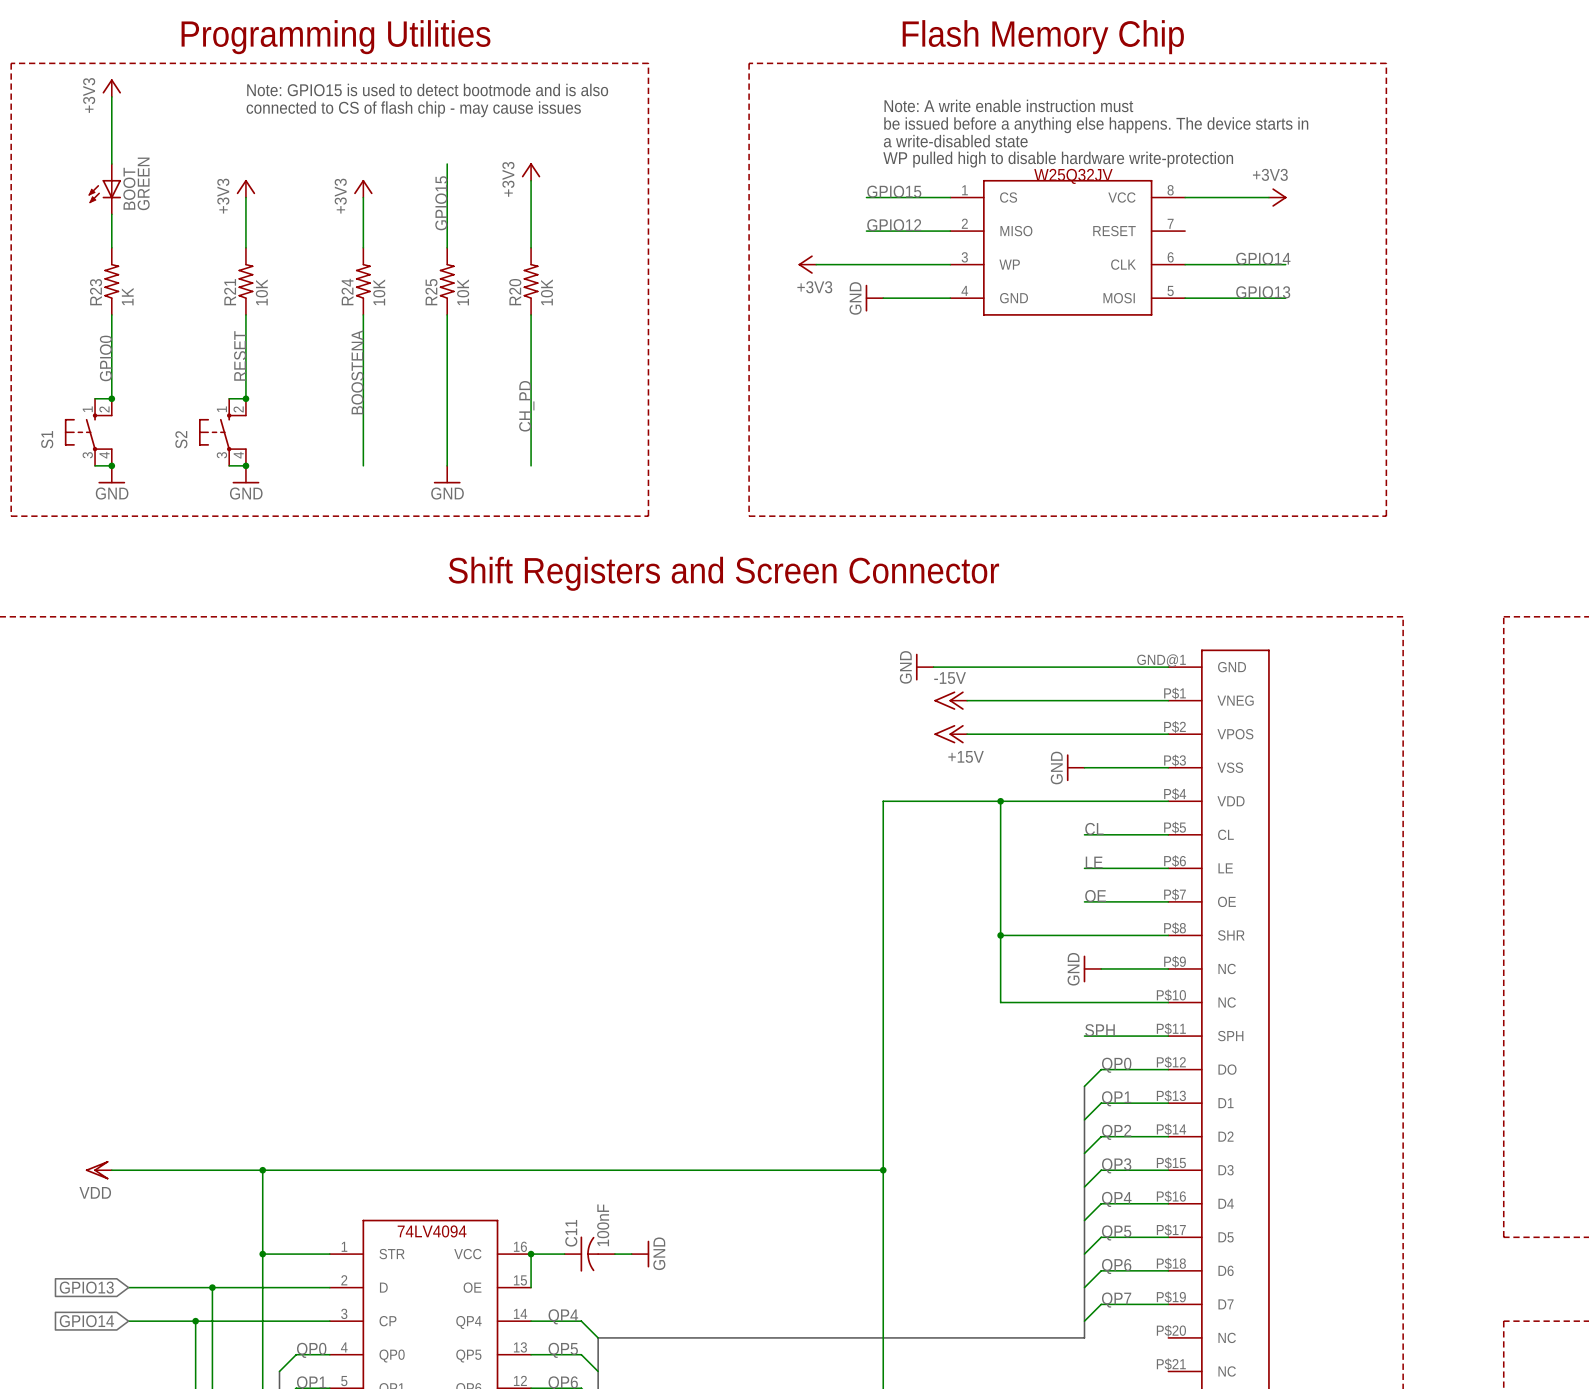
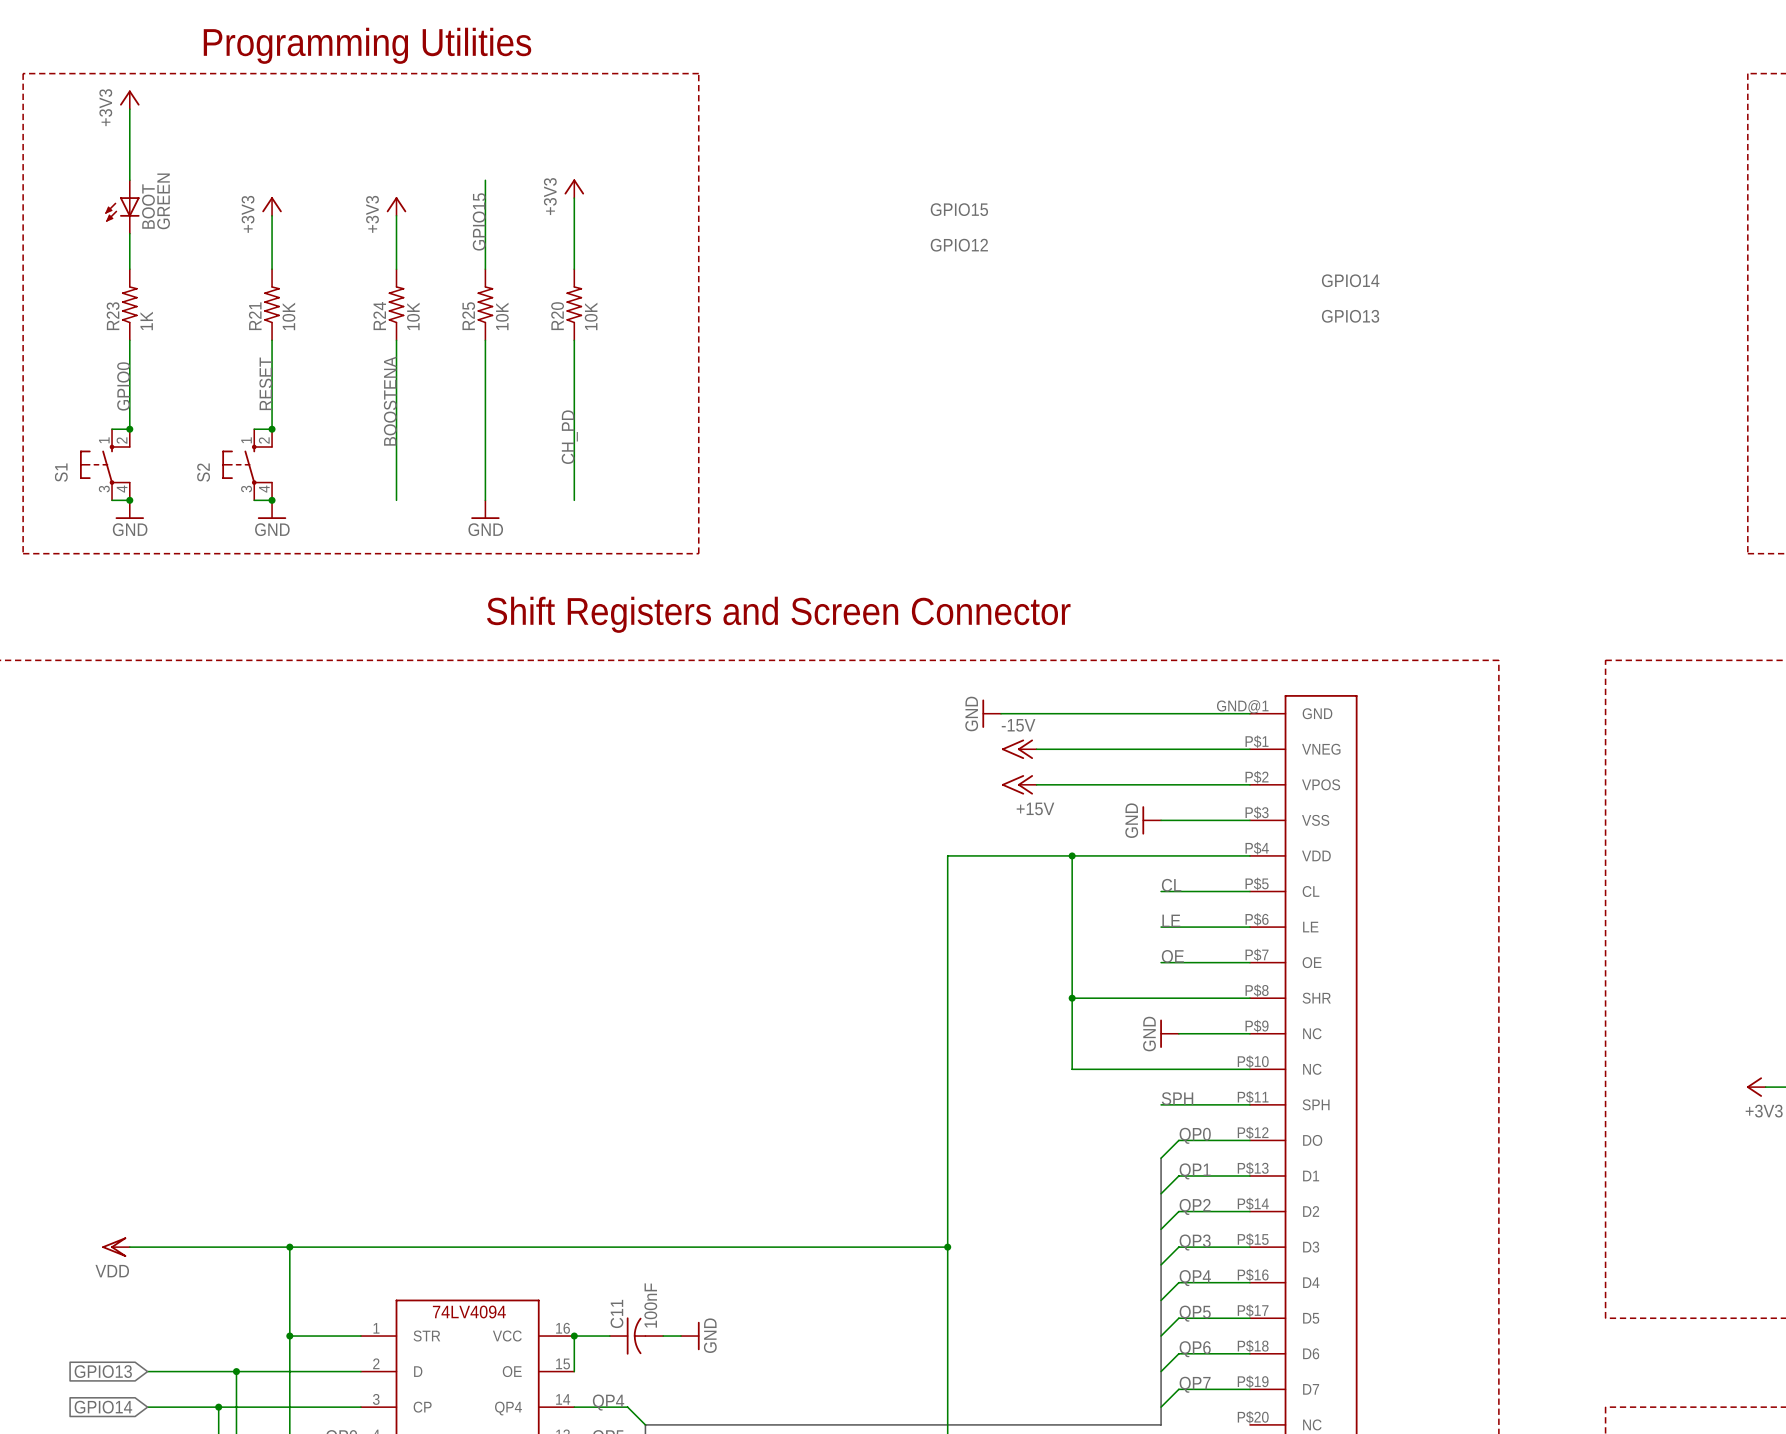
text: Flash Memory Chip (1043, 37) -> none
line: (749, 63) (749, 516) (1386, 516) (1386, 63) (749, 63) -> none
text: Note: GPIO15 is used to detect bootmode and is also (427, 89) -> none
text: Note: A write enable instruction must (1008, 105) -> none
text: connected to CS of flash chip - may cause issues (413, 109) -> none
text: be issued before a anything else happens. The device starts in (1096, 125) -> none
text: a write-disabled state (955, 141) -> none
text: WP pulled high to disable hardware write-protection (1058, 159) -> none
wire: (866, 197) (950, 197) -> none
wire: (1185, 197) (1268, 197) -> none
power symbol: +3V3 (1277, 197) -> none
wire: (866, 231) (950, 231) -> none
part: (1067, 247) -> none
power symbol: +3V3 (807, 264) -> none
wire: (816, 264) (950, 264) -> none
wire: (1185, 264) (1285, 264) -> none
power symbol: GND (874, 298) -> none
wire: (883, 298) (950, 298) -> none
wire: (1185, 298) (1285, 298) -> none

